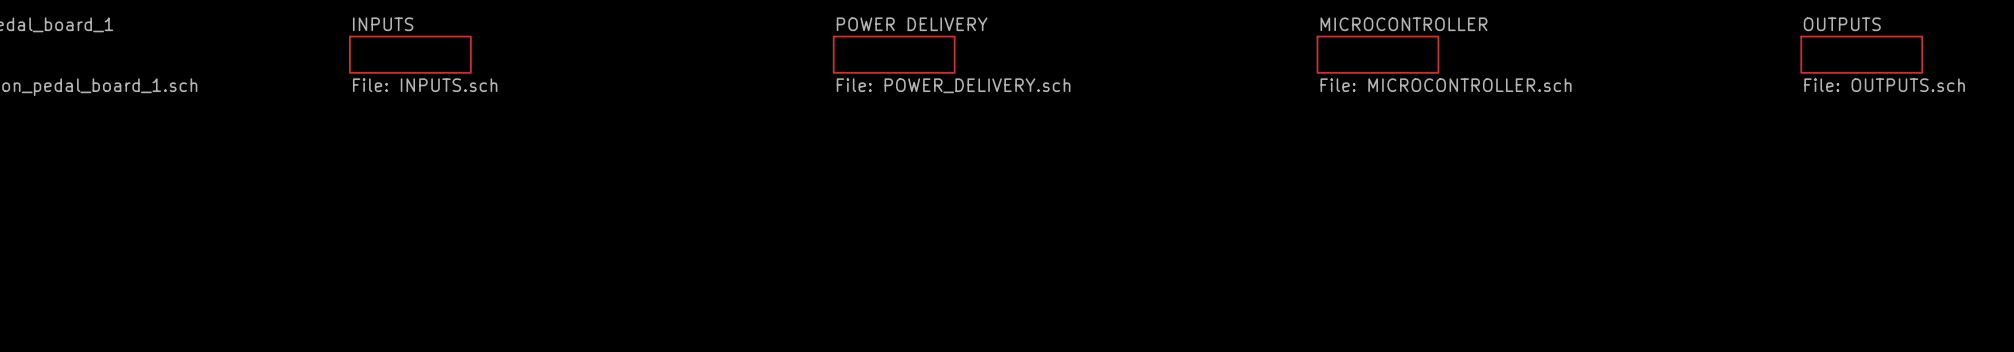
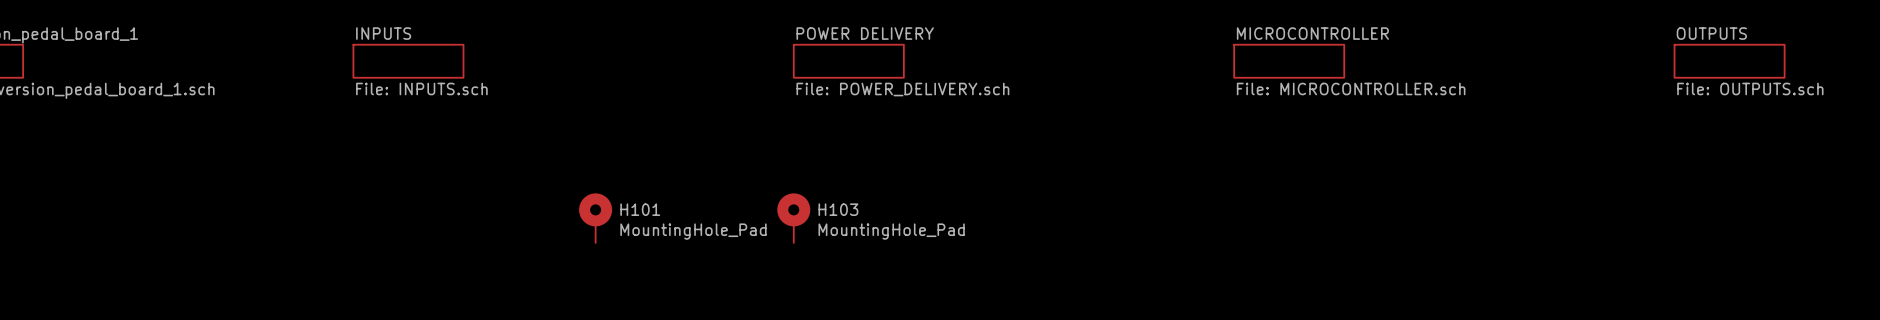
H101: none -> MountingHole_Pad (595, 218)
H103: none -> MountingHole_Pad (793, 218)

